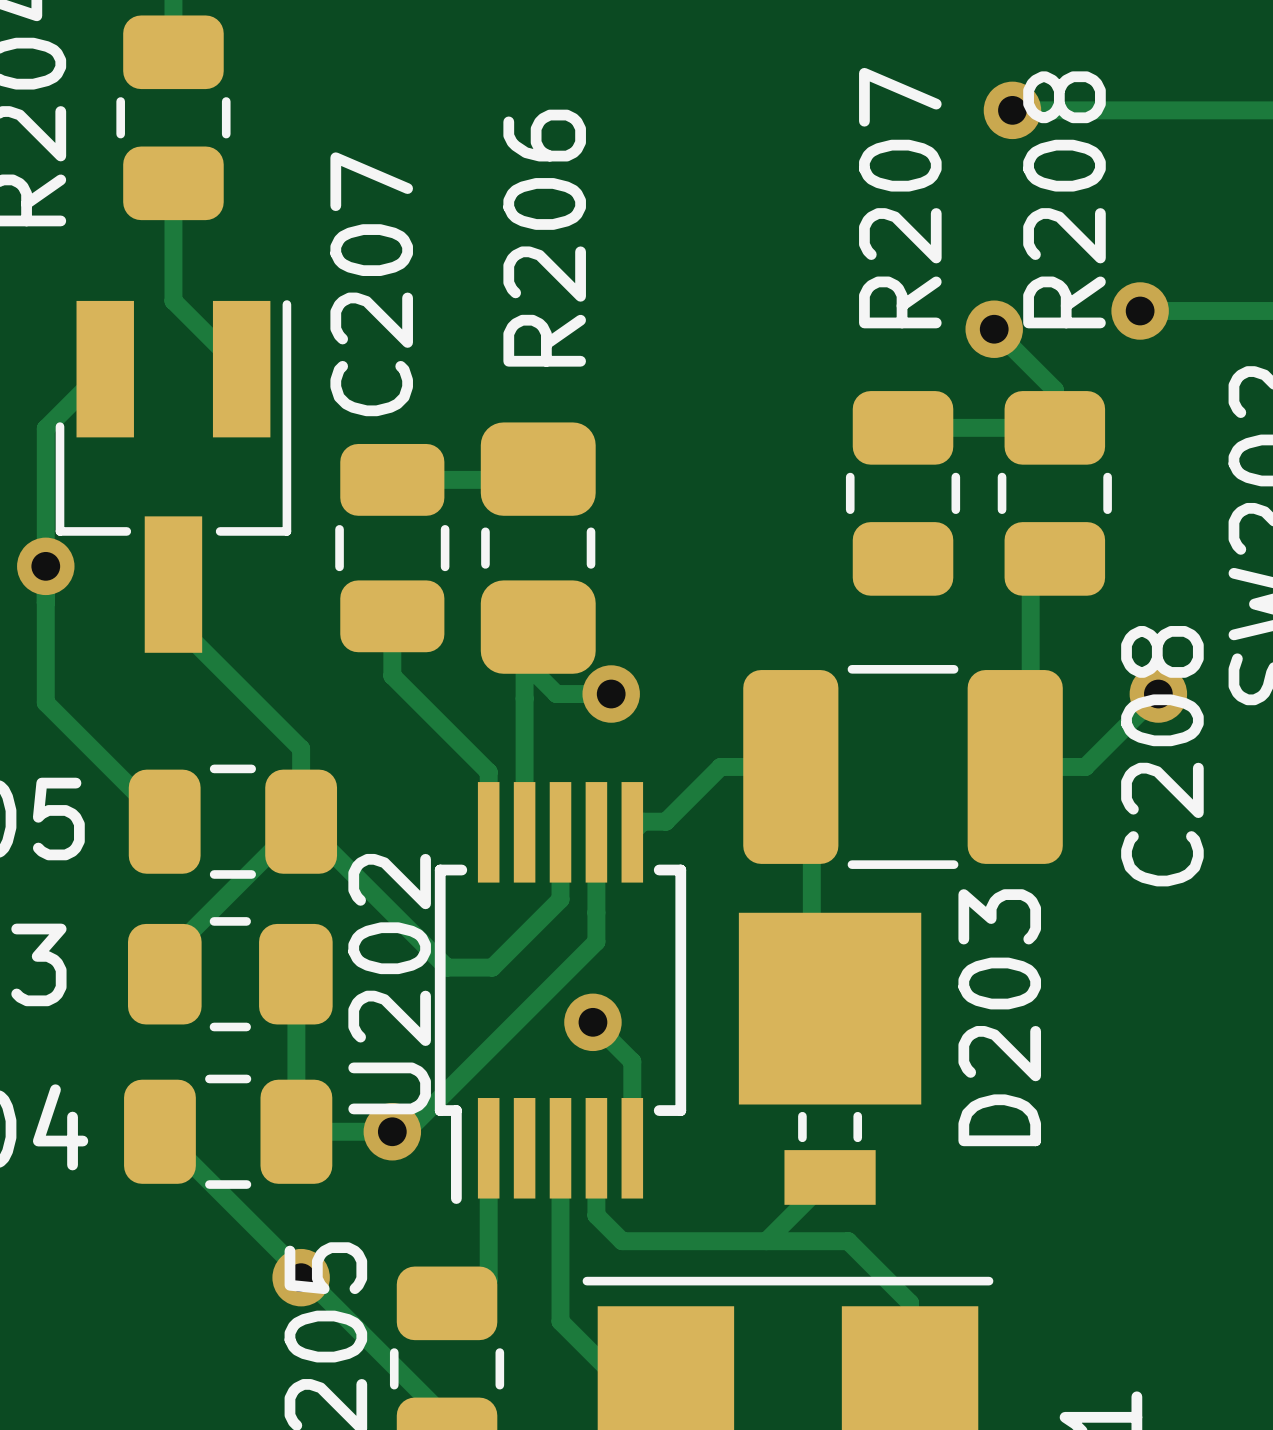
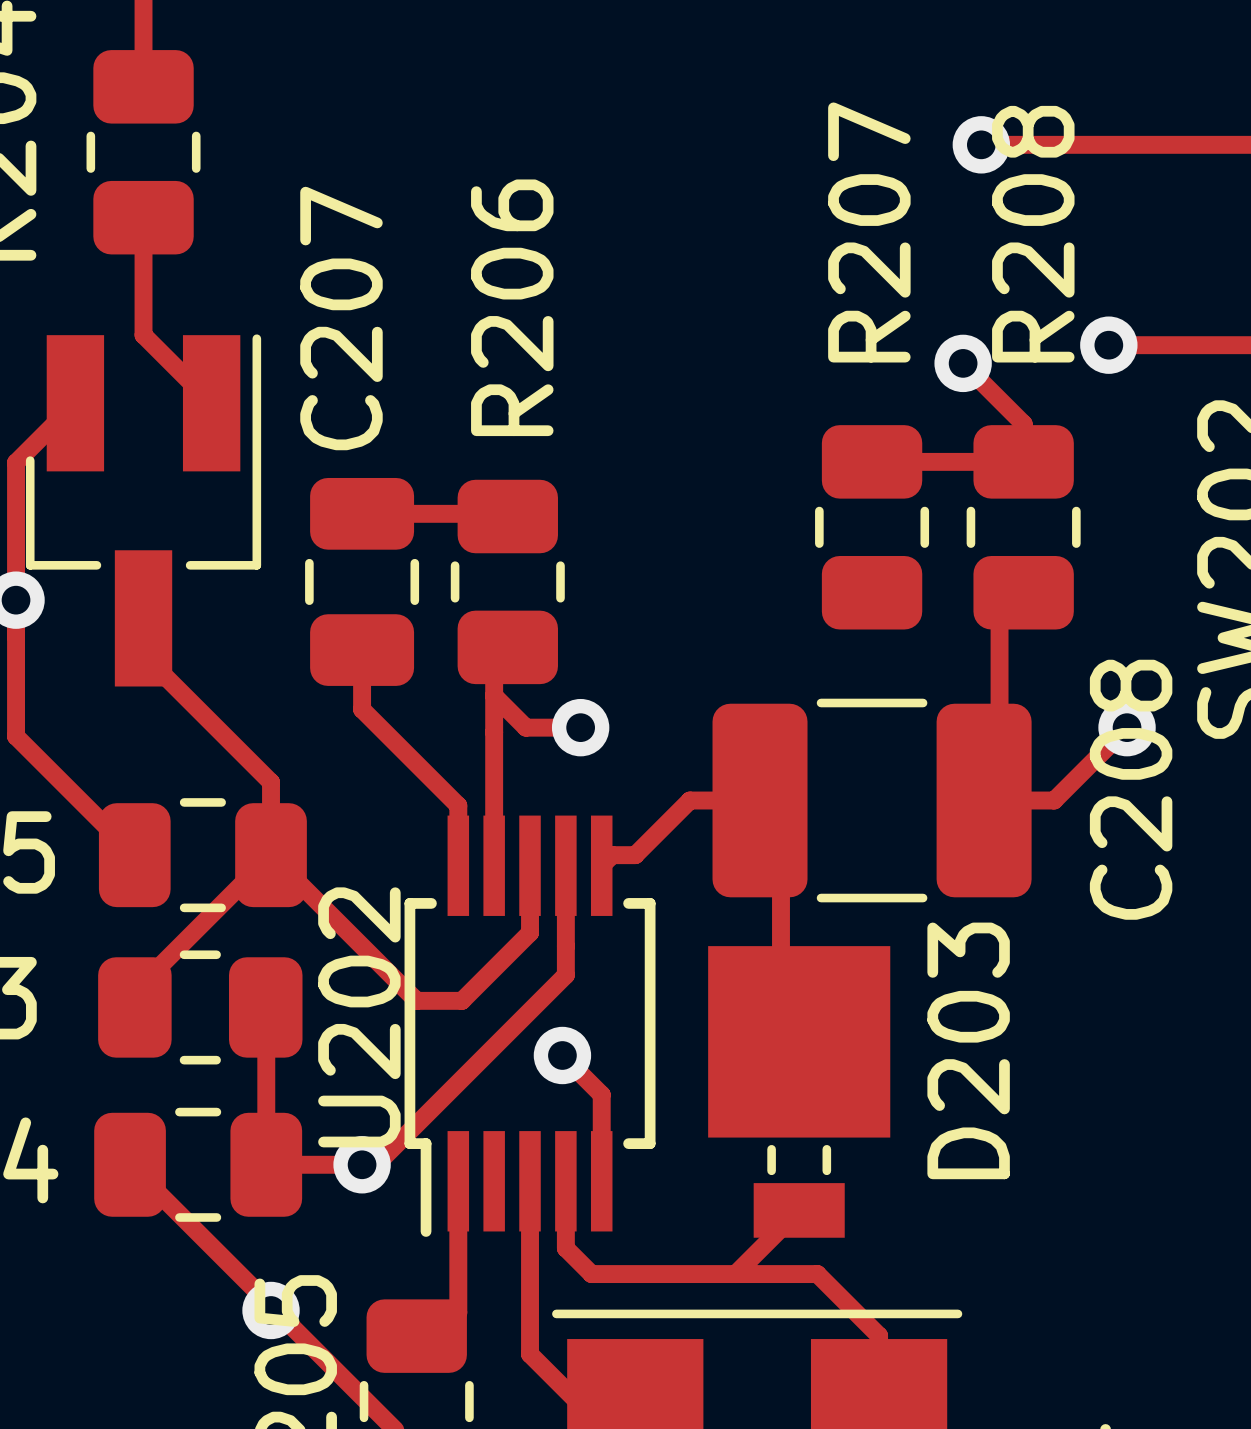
R206 name position: R206 (544, 238) -> R206 (512, 307)
R206 footprint: [480, 422, 596, 674] -> [450, 479, 565, 685]

